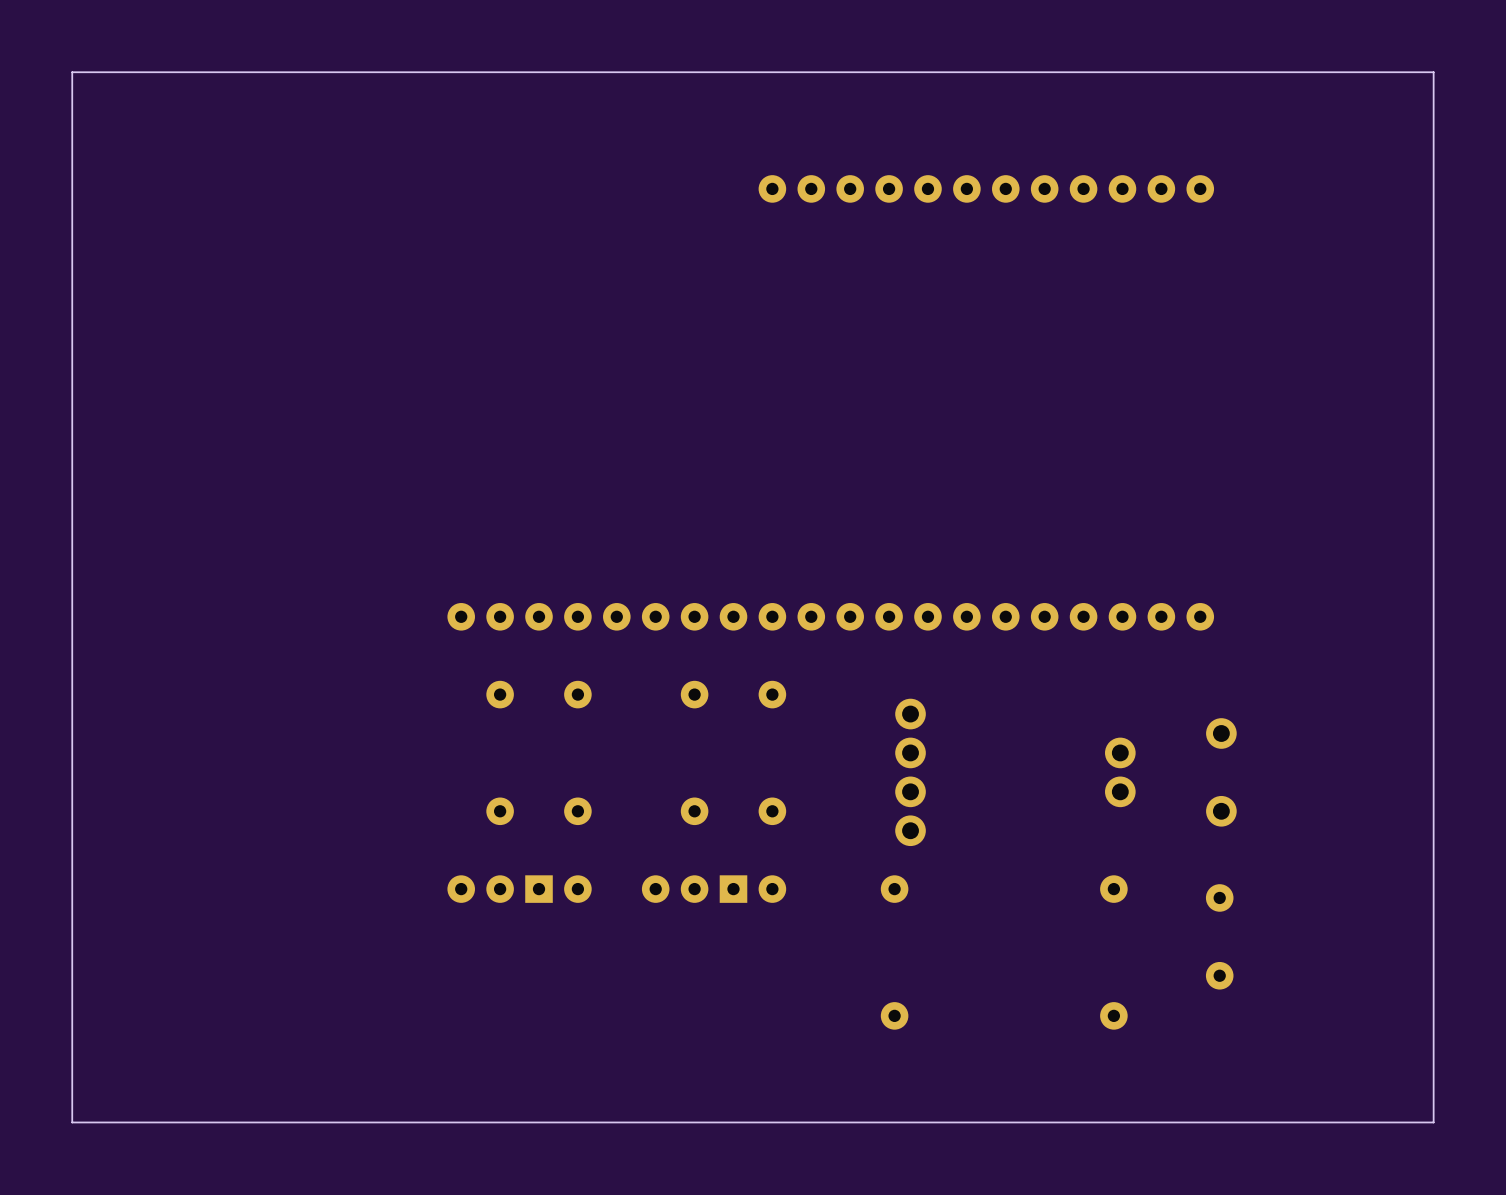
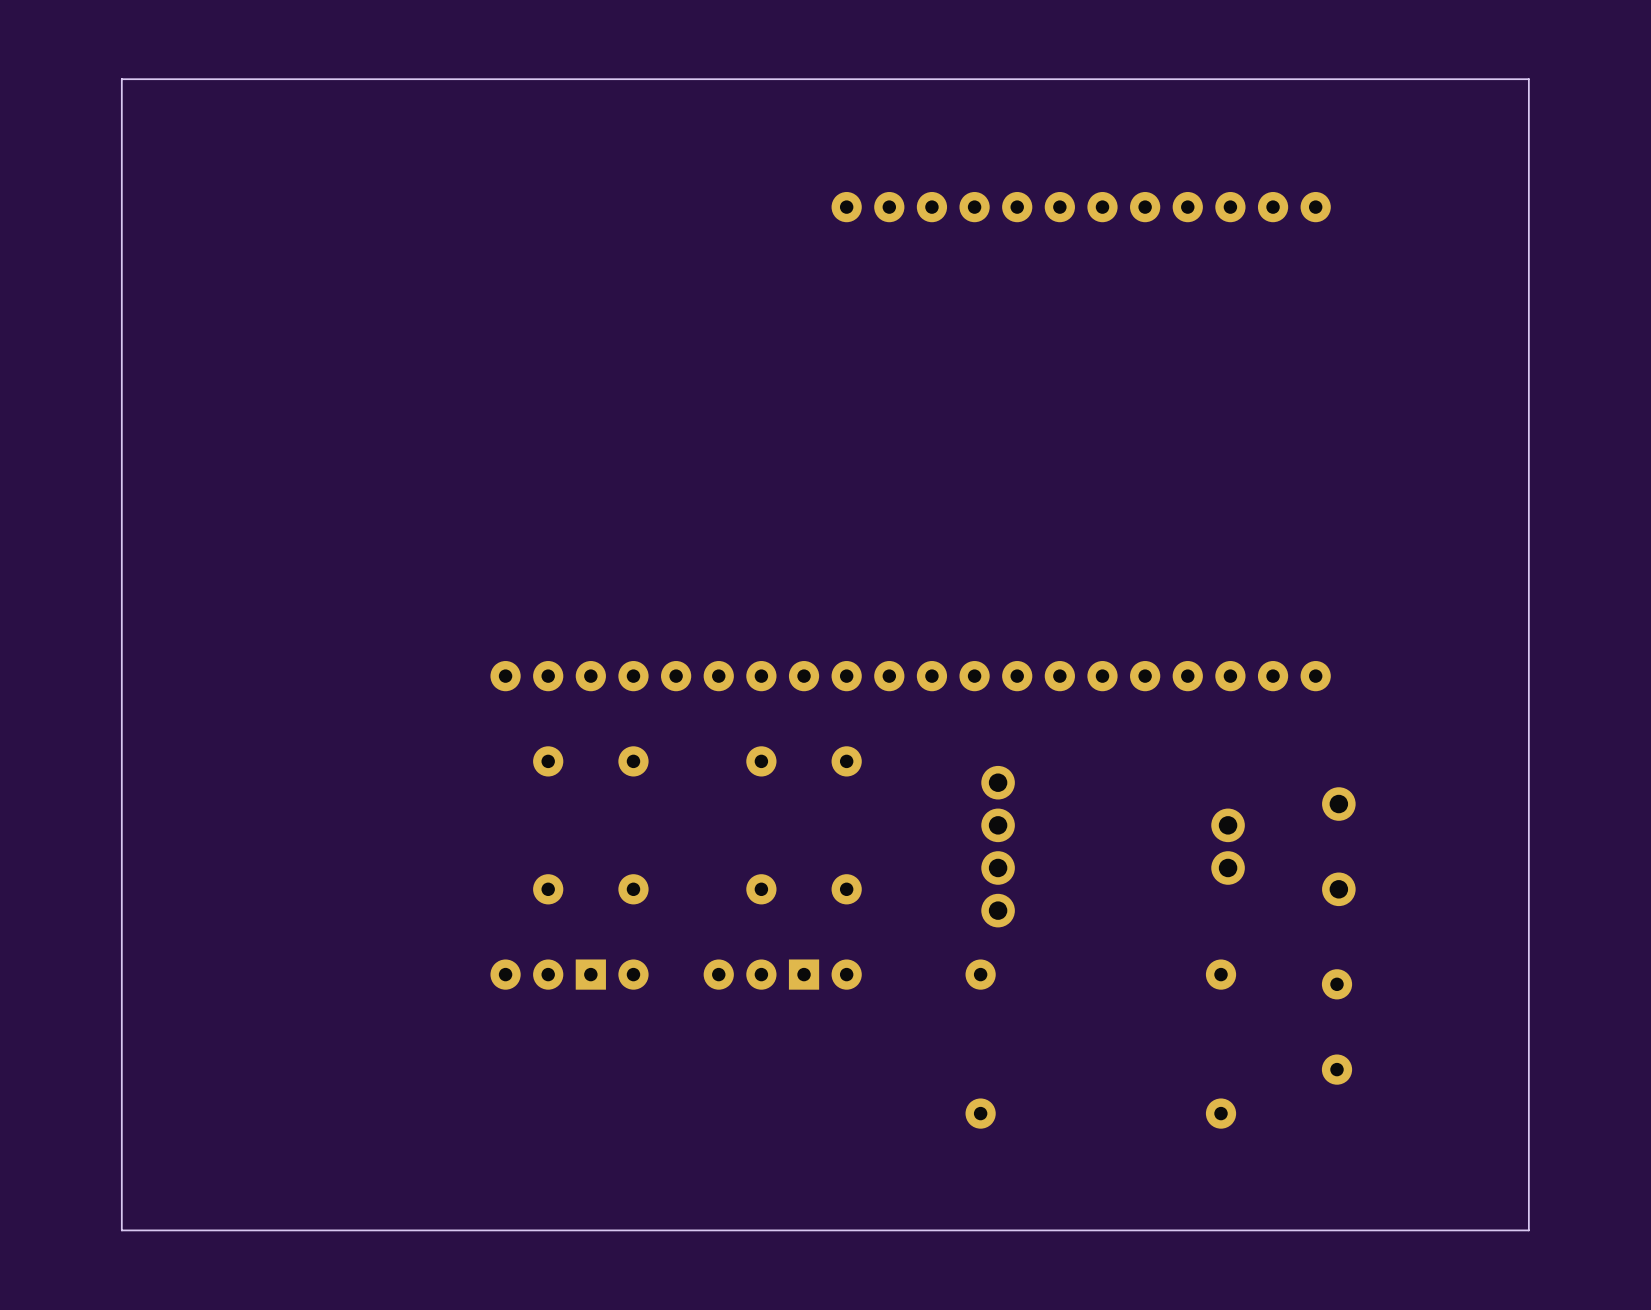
board edge: (111, 72) (72, 72) (72, 1122) (111, 1122) -> (121, 79) (121, 1230)
board edge: (1394, 72) (1433, 72) (1433, 1122) (1394, 1122) -> (1528, 79) (1528, 1230)

